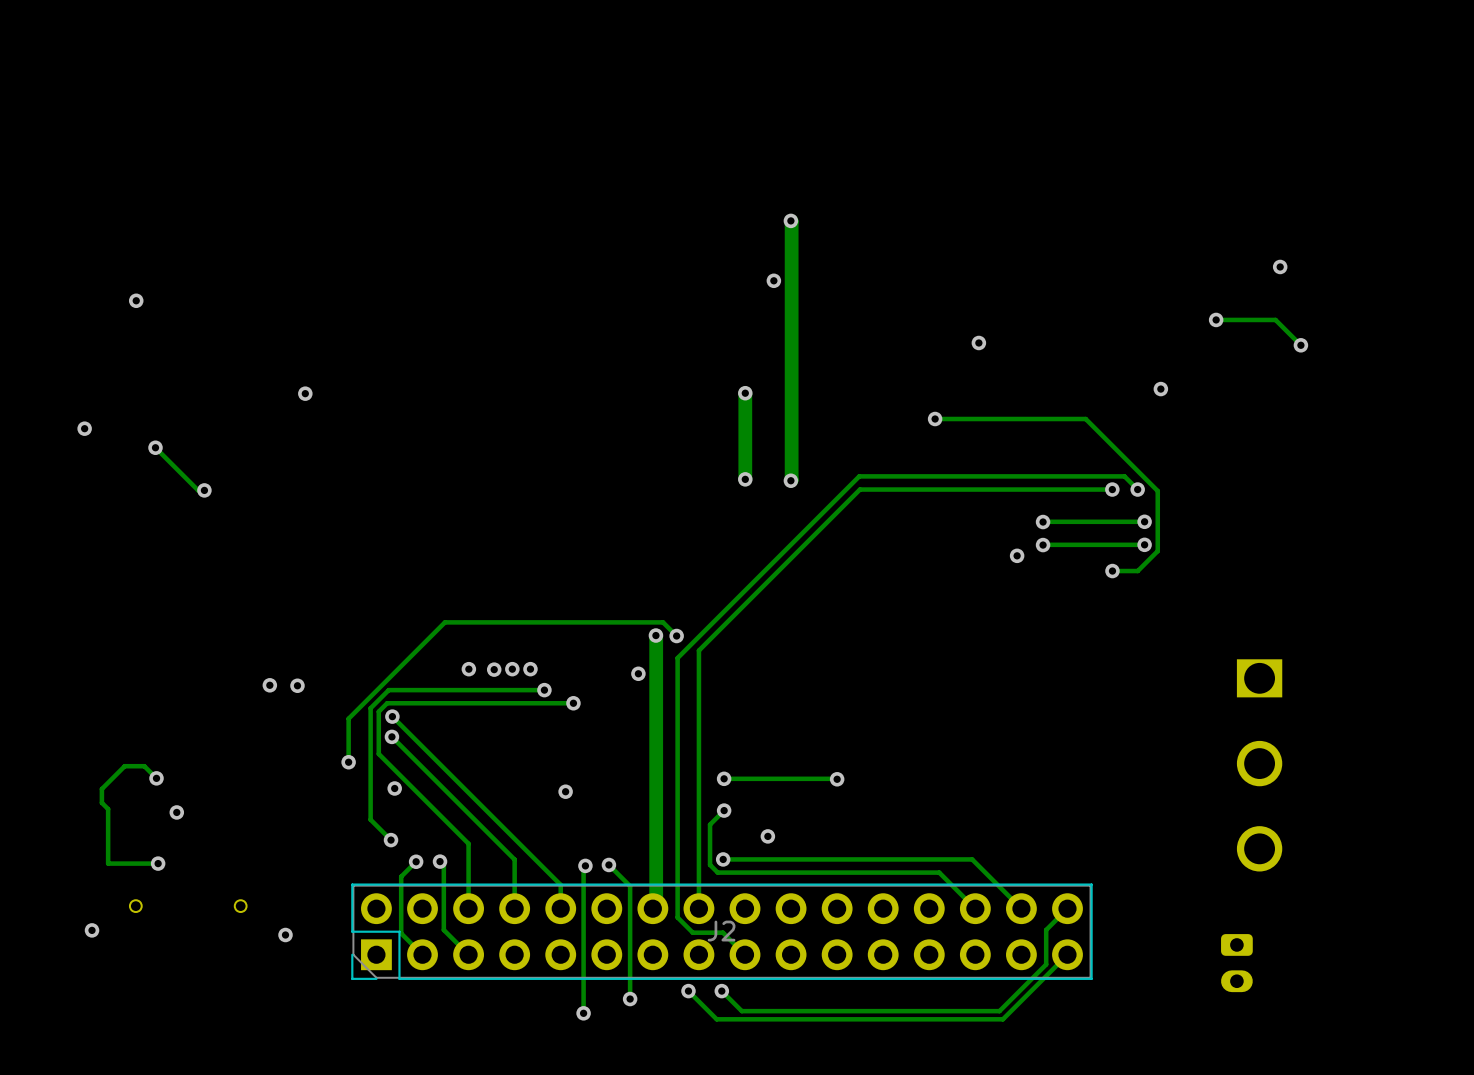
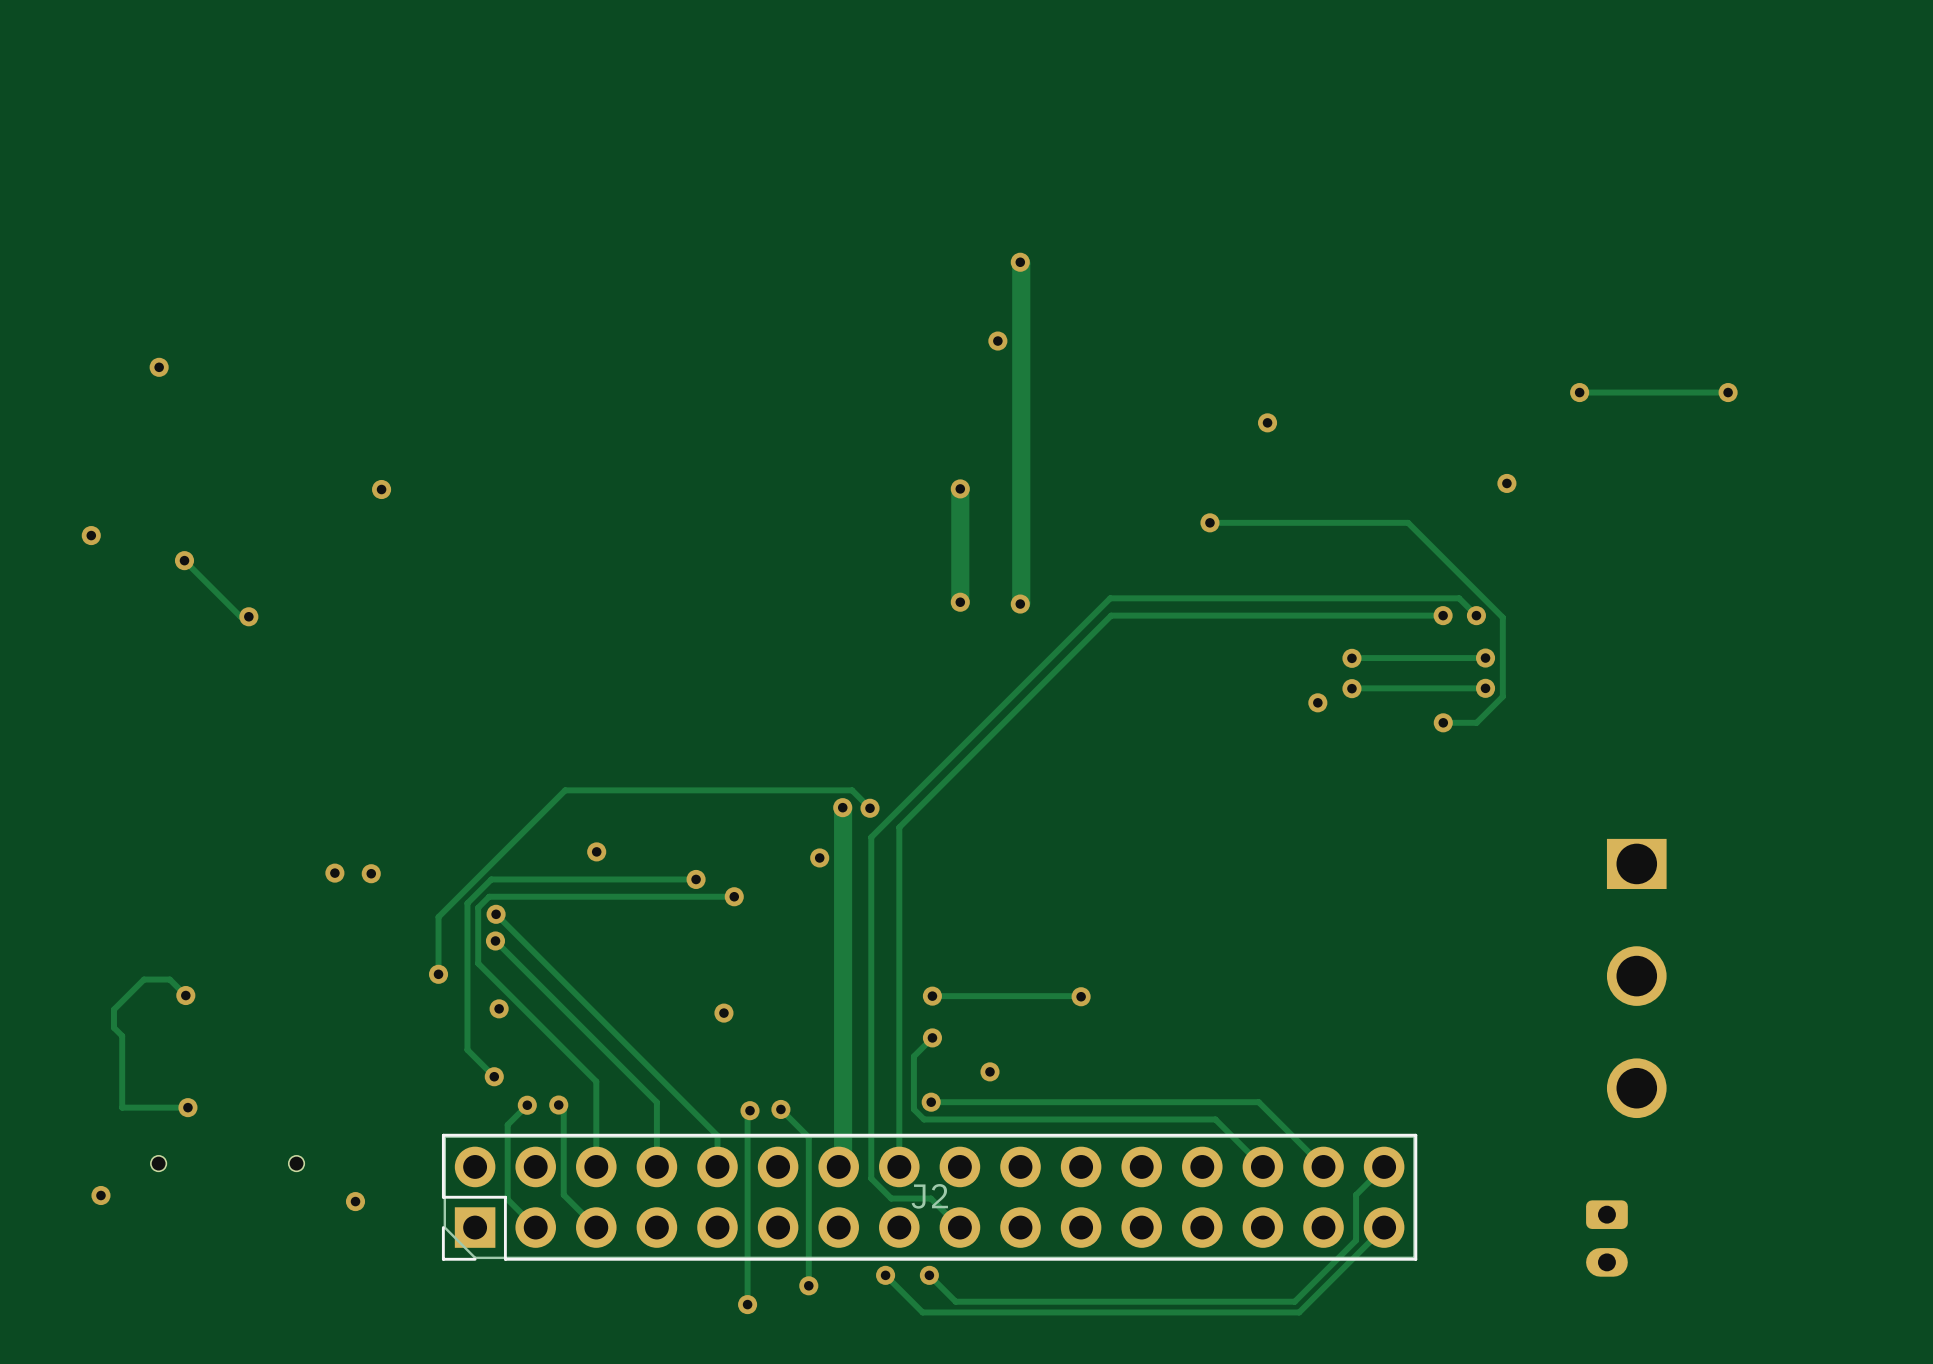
via: (1280, 266) -> none
track: (1275, 319) (1300, 345) -> (1657, 392) (1728, 392)
via: none -> (1728, 392)
via: (1300, 345) -> none
via: (494, 669) -> none
via: (512, 669) -> none
via: (530, 669) -> none
via: (176, 812) -> none

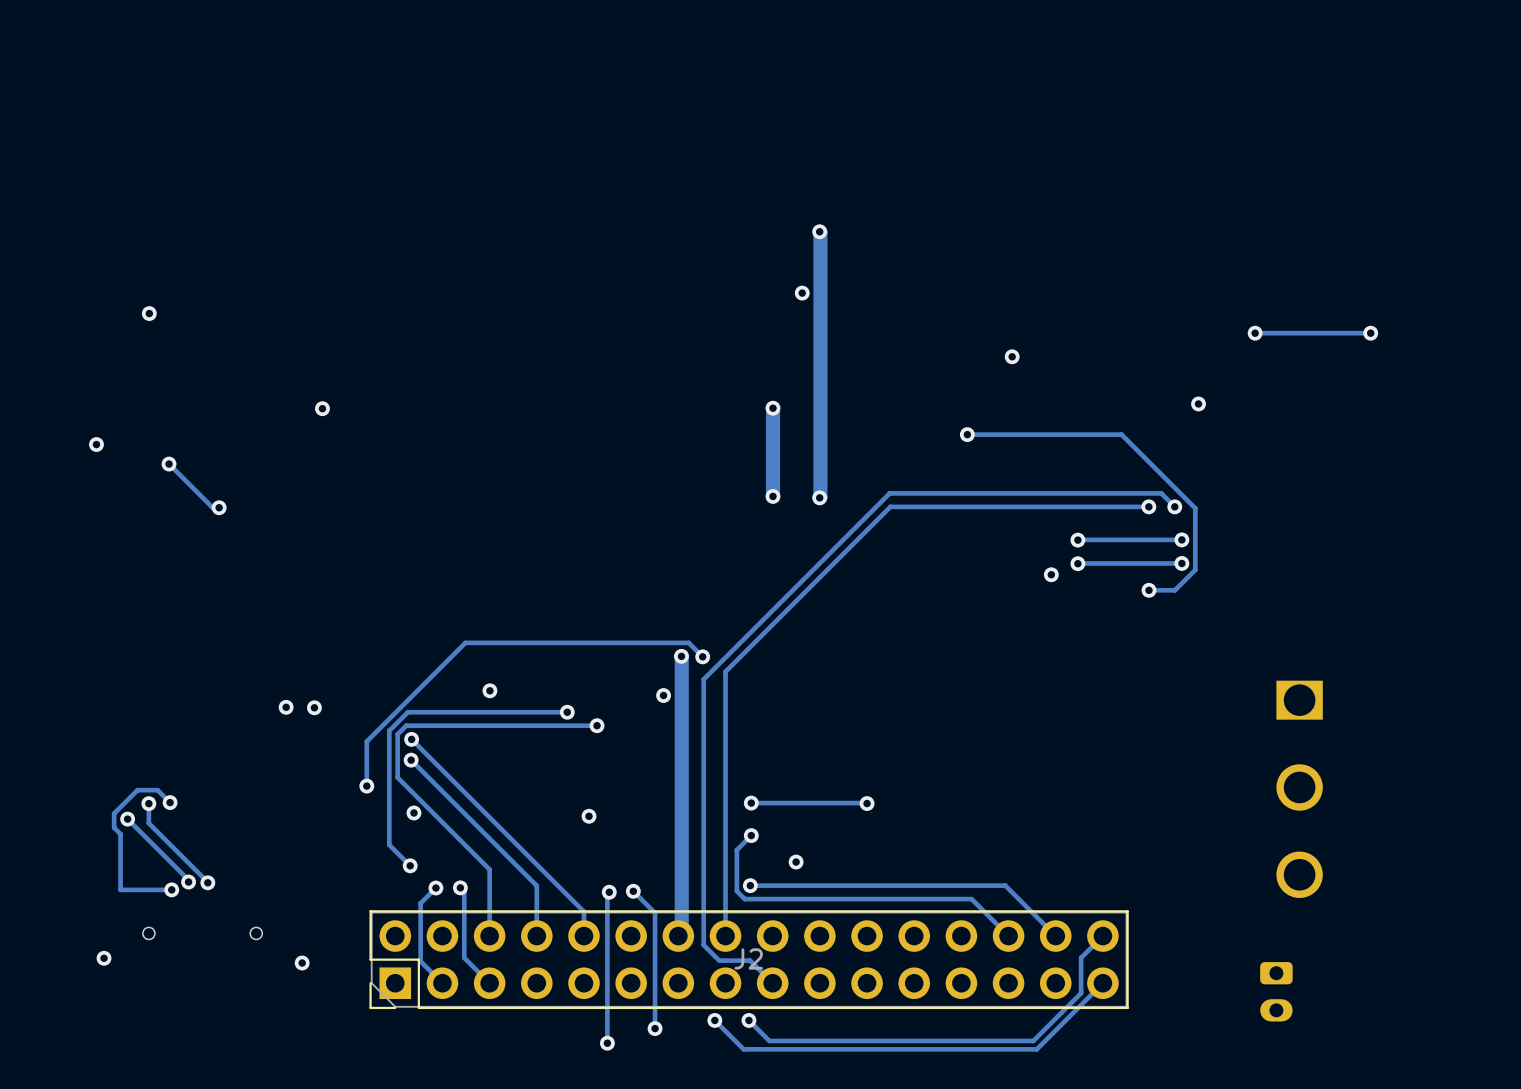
track: none -> (148, 803) (148, 823) (207, 882)
via: none -> (148, 803)
track: none -> (127, 819) (188, 882)
via: none -> (127, 819)
via: none -> (188, 882)
via: none -> (207, 882)

